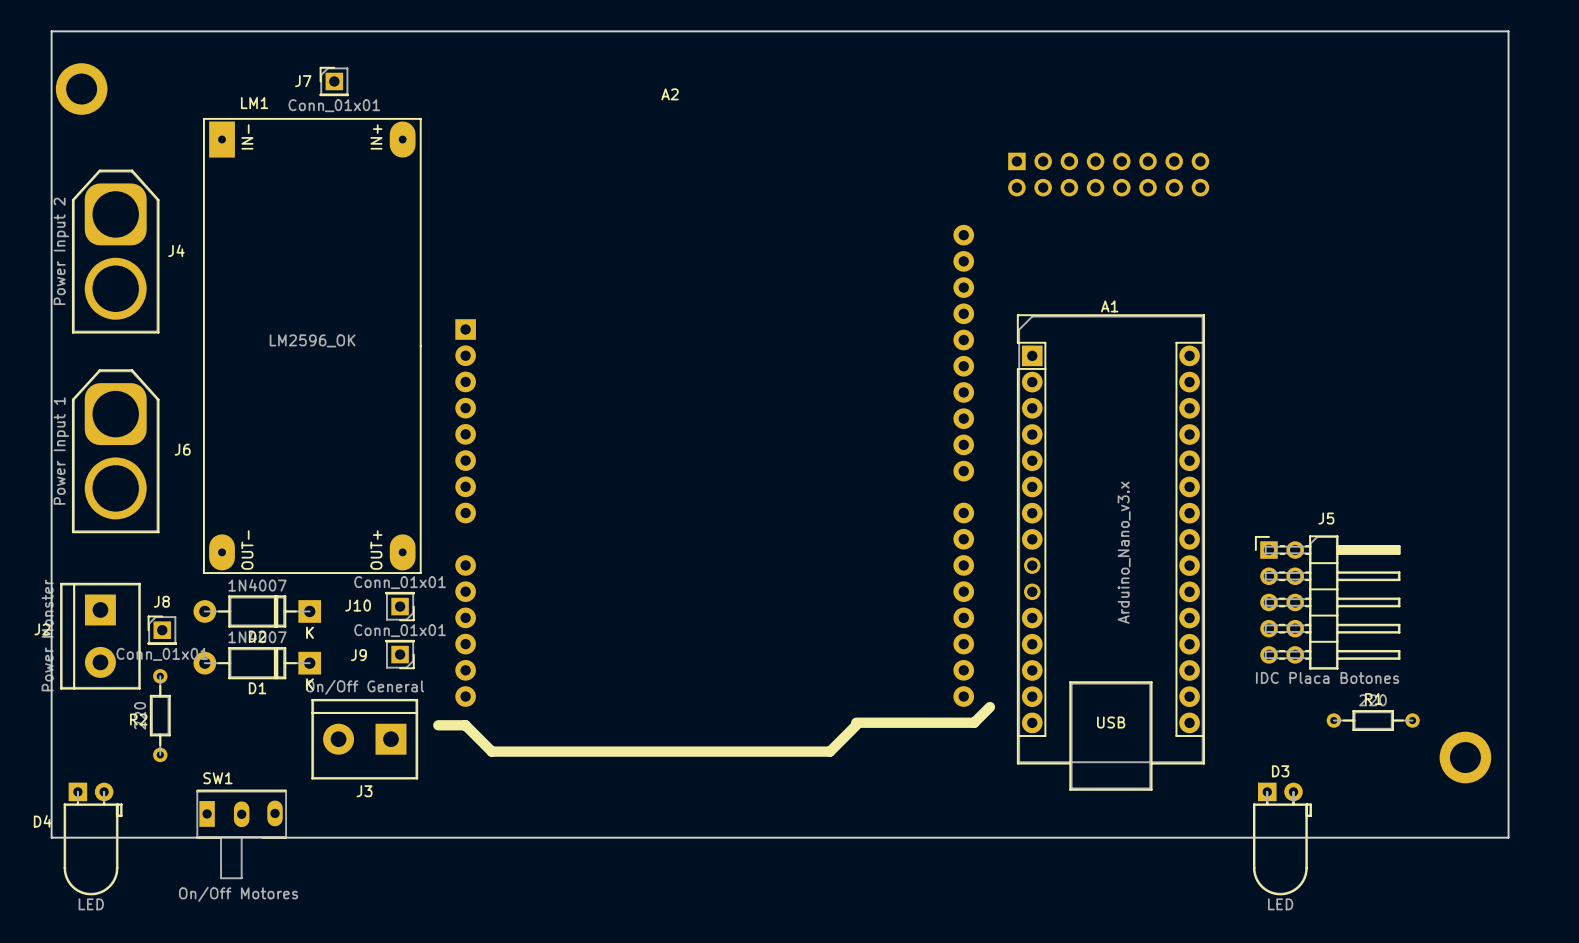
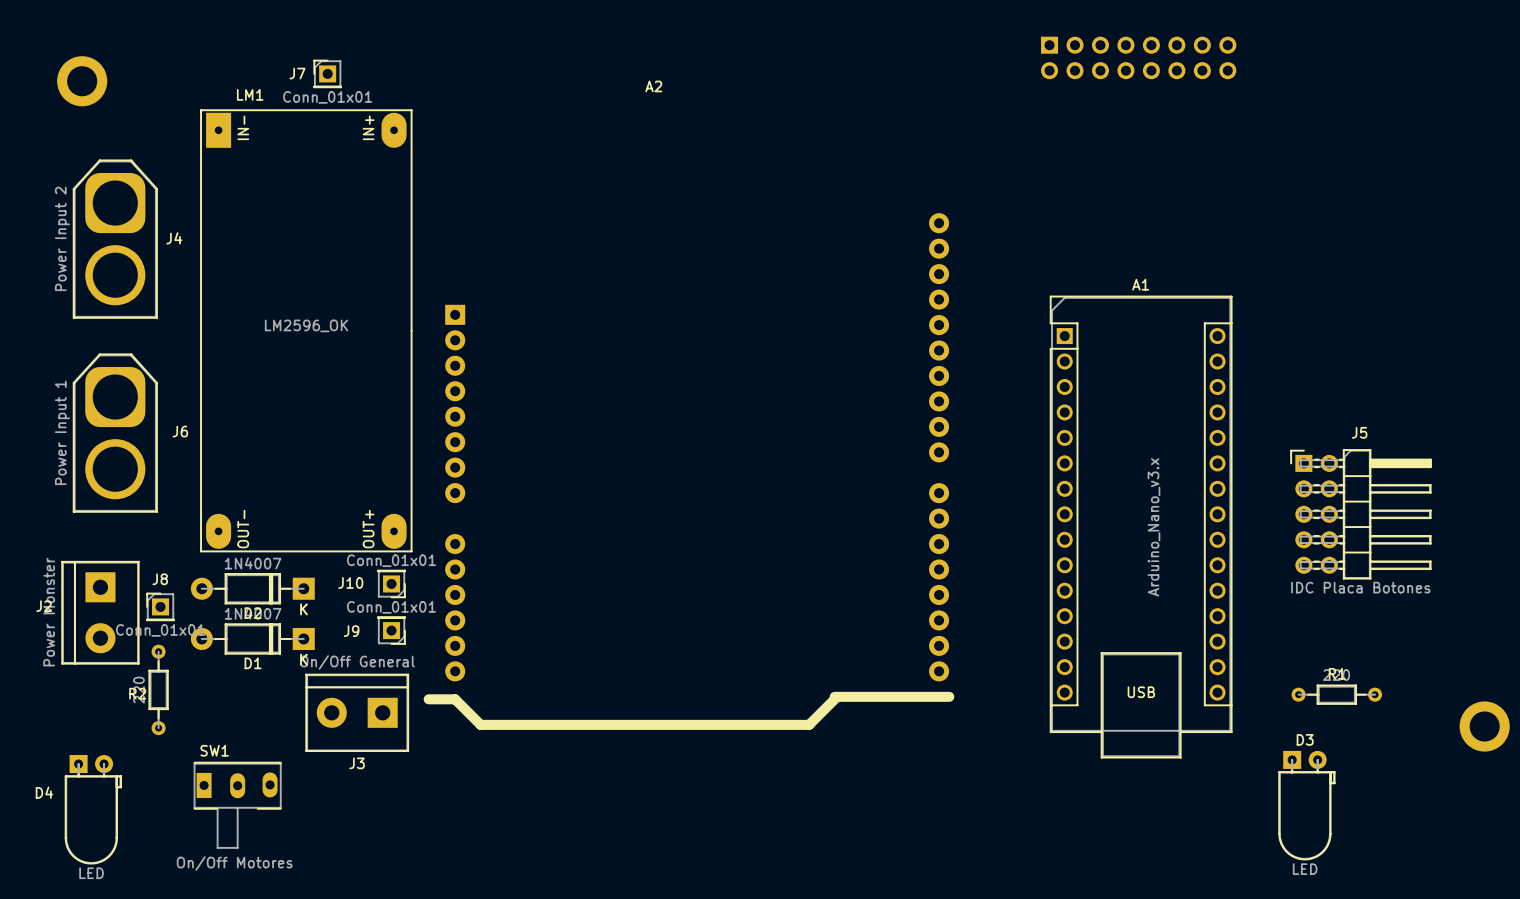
board edge: (51, 31) (1508, 31) (1508, 837) (51, 837) (51, 31) -> none
part position: (1108, 174) -> (1138, 57)
A1 footprint: [1017, 314, 1205, 791] -> [1050, 295, 1233, 759]
J5 position: (1327, 602) -> (1360, 514)
line: (989, 707) (974, 722) -> none
part position: (1465, 757) -> (1484, 726)
D3 position: (1282, 838) -> (1306, 805)

